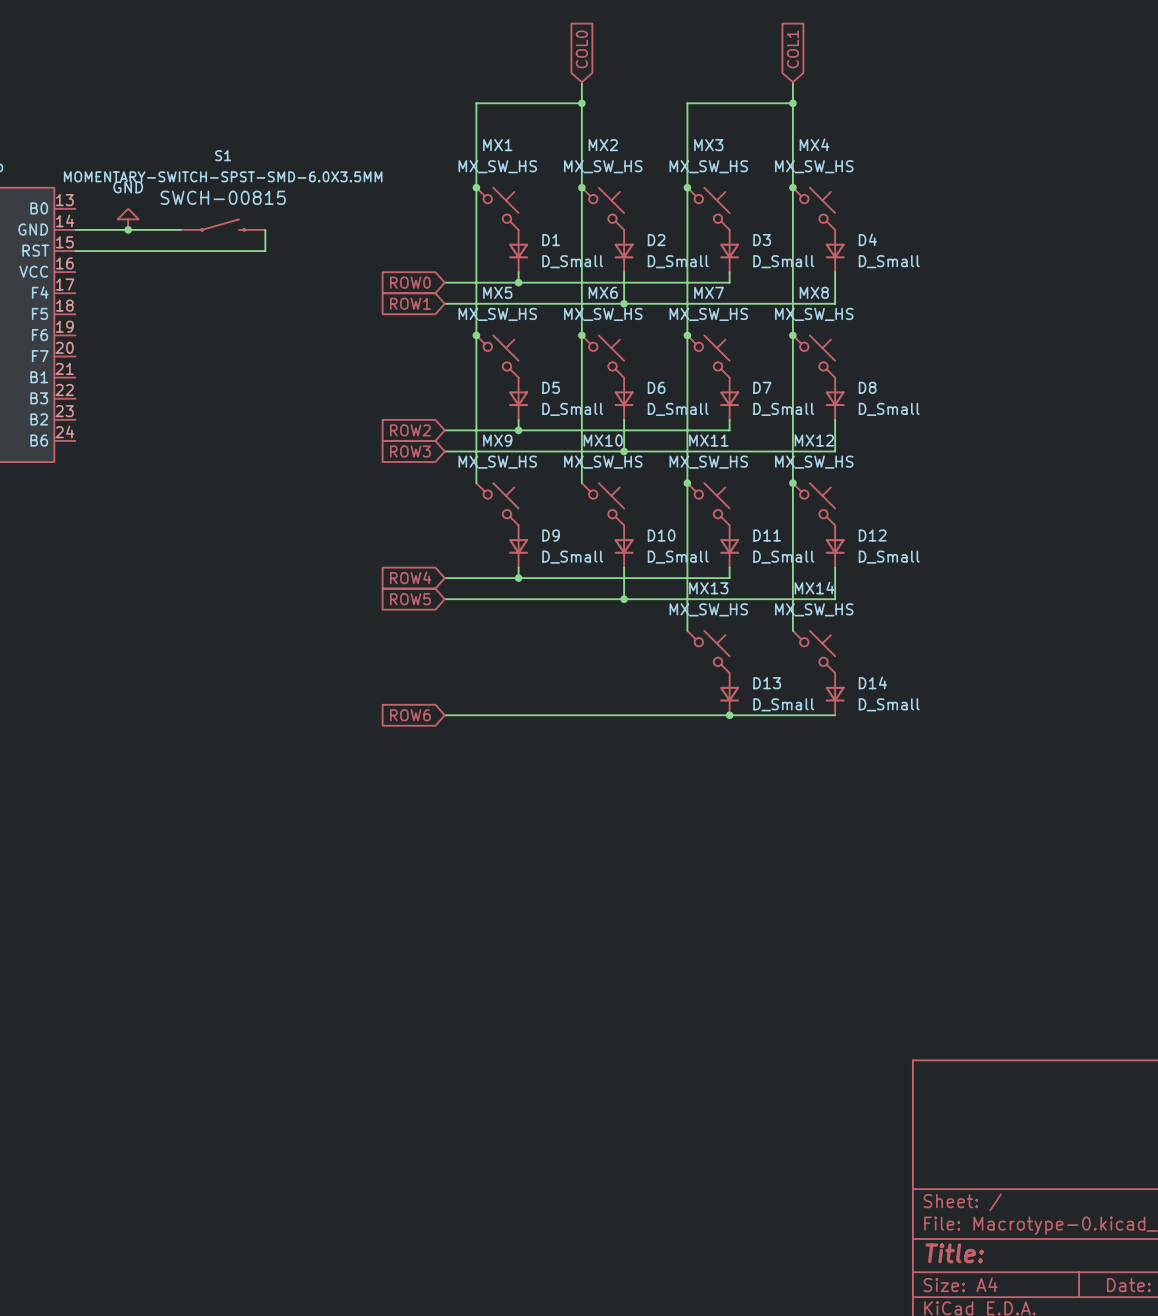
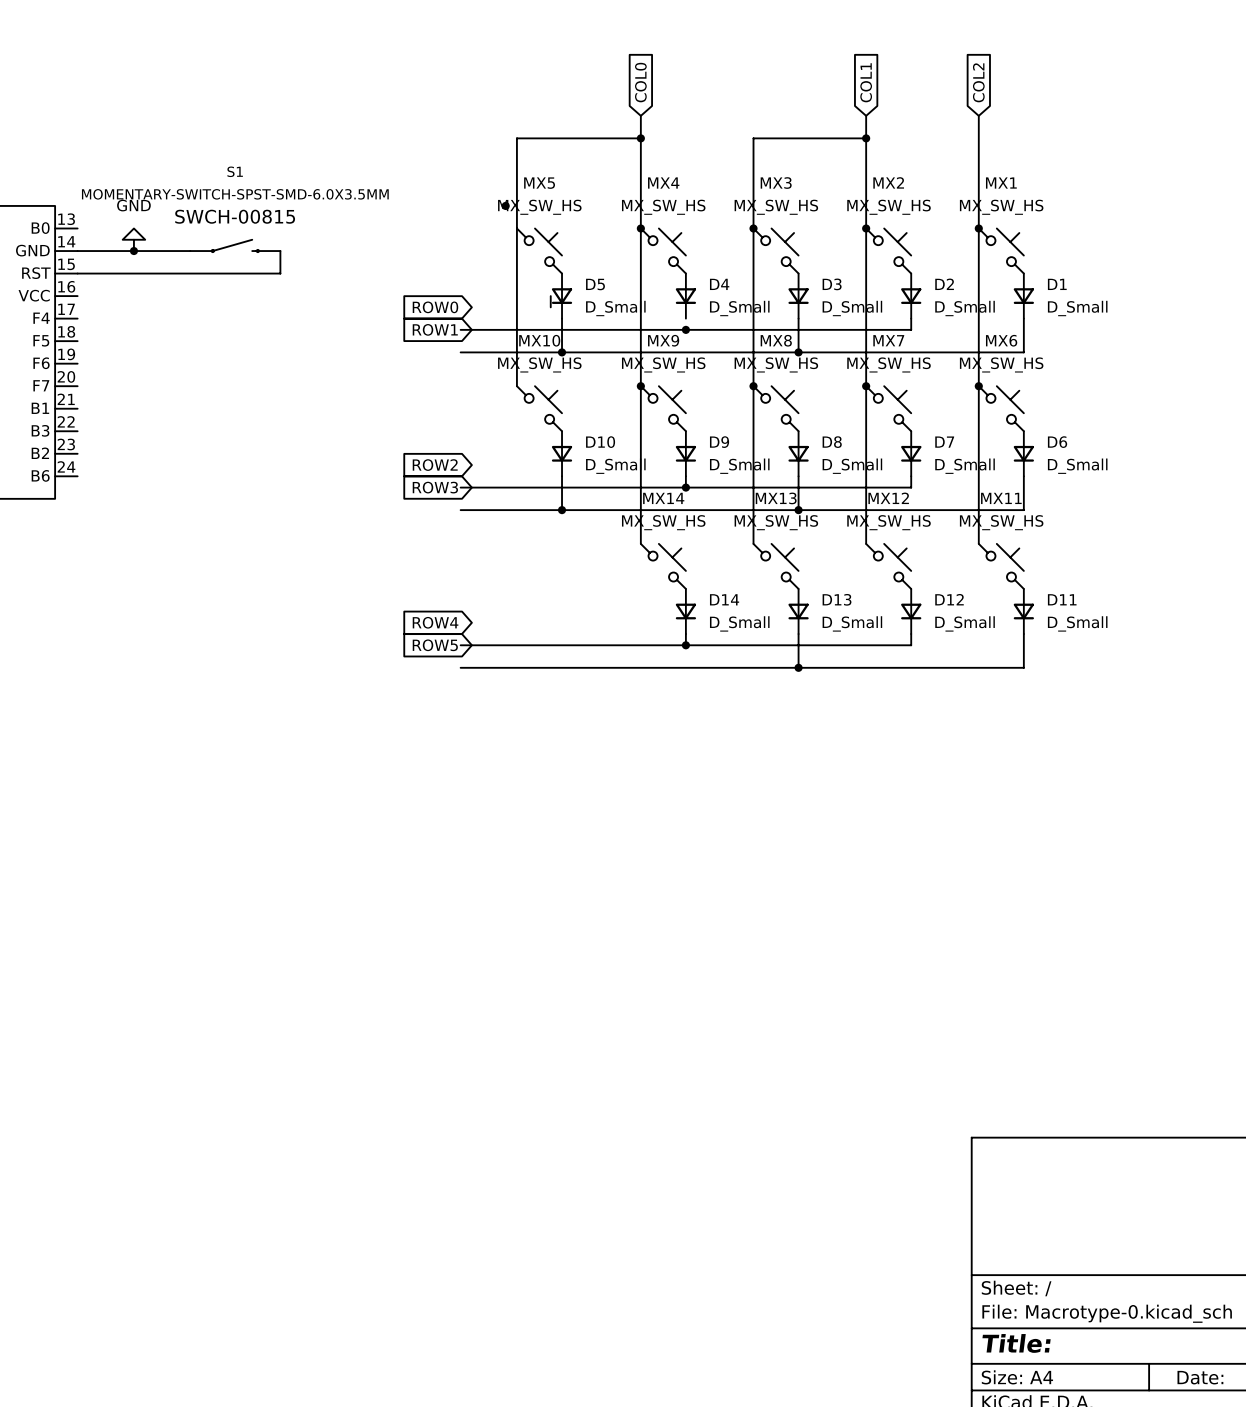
global label position: COL0 (581, 49) -> COL0 (640, 82)
global label position: COL1 (792, 49) -> COL1 (866, 82)
global label: none -> COL2 (978, 82)
wire: (581, 82) (581, 483) -> (640, 115) (640, 543)
wire: (792, 82) (792, 630) -> none
wire: (581, 103) (476, 103) (476, 483) -> none
junction position: (581, 103) -> (640, 138)
wire: (792, 103) (687, 103) (687, 630) -> none
junction position: (792, 103) -> (866, 138)
wire: none -> (866, 115) (866, 543)
wire: none -> (978, 115) (978, 543)
wire: none -> (640, 138) (516, 138) (516, 386)
wire: none -> (866, 138) (753, 138) (753, 543)
junction position: (581, 187) -> (640, 228)
junction position: (687, 187) -> (753, 228)
junction position: (792, 187) -> (866, 228)
MX1 position: (497, 208) -> (1001, 251)
MX2 position: (603, 208) -> (888, 251)
MX3 position: (708, 208) -> (776, 251)
MX4 position: (814, 208) -> (663, 251)
junction: none -> (978, 228)
D1 position: (518, 251) -> (1023, 296)
D2 position: (624, 251) -> (911, 296)
D3 position: (729, 251) -> (798, 296)
D4 position: (835, 251) -> (685, 296)
wire: (624, 272) (624, 303) -> (798, 318) (798, 352)
wire: (729, 272) (729, 282) (444, 282) -> none
wire: (835, 272) (835, 303) -> (911, 318) (911, 329) (888, 329)
junction: (518, 282) -> none
wire: none -> (562, 318) (562, 352)
wire: none -> (1023, 318) (1023, 352) (460, 352)
wire: none -> (460, 329) (471, 329)
junction position: (624, 303) -> (685, 329)
junction: none -> (562, 352)
junction: none -> (798, 352)
junction: (476, 335) -> none
junction: (581, 335) -> none
junction: (687, 335) -> none
junction: (792, 335) -> none
MX5 position: (497, 356) -> (539, 251)
junction: none -> (640, 386)
MX6 position: (603, 356) -> (1001, 408)
junction: none -> (753, 386)
MX7 position: (708, 356) -> (888, 408)
junction: none -> (866, 386)
MX8 position: (814, 356) -> (776, 408)
junction: none -> (978, 386)
D5 position: (518, 398) -> (562, 296)
D6 position: (624, 398) -> (1023, 453)
D7 position: (729, 398) -> (911, 453)
D8 position: (835, 398) -> (798, 453)
wire: (518, 419) (518, 430) -> (685, 476) (685, 487)
wire: (624, 419) (624, 451) -> (798, 476) (798, 510)
wire: (729, 419) (729, 430) (444, 430) -> none
wire: (835, 419) (835, 451) -> (911, 476) (911, 487) (888, 487)
junction position: (518, 430) -> (562, 510)
wire: none -> (562, 476) (562, 510)
wire: none -> (1023, 476) (1023, 510) (460, 510)
wire: none -> (460, 487) (471, 487)
junction position: (624, 451) -> (685, 487)
junction: none -> (798, 510)
junction: (687, 483) -> none
junction: (792, 483) -> none
MX9 position: (497, 504) -> (663, 408)
MX10 position: (603, 504) -> (539, 408)
MX11 position: (708, 504) -> (1001, 566)
MX12 position: (814, 504) -> (888, 566)
D9 position: (518, 546) -> (685, 453)
D10 position: (624, 546) -> (562, 453)
D11 position: (729, 546) -> (1023, 611)
D12 position: (835, 546) -> (911, 611)
wire: (518, 567) (518, 578) -> (685, 634) (685, 645)
wire: (624, 567) (624, 599) -> (798, 634) (798, 667)
wire: (729, 567) (729, 578) (444, 578) -> none
wire: (835, 567) (835, 599) -> (911, 634) (911, 645) (888, 645)
junction: (518, 578) -> none
wire: none -> (1023, 634) (1023, 667) (460, 667)
wire: none -> (460, 645) (471, 645)
junction position: (624, 599) -> (685, 645)
junction: none -> (798, 667)
MX13 position: (708, 651) -> (776, 566)
MX14 position: (814, 651) -> (663, 566)
D13 position: (729, 694) -> (798, 611)
D14 position: (835, 694) -> (685, 611)
global label: ROW6 (410, 715) -> none
wire: (444, 715) (835, 715) -> none
junction: (729, 715) -> none

